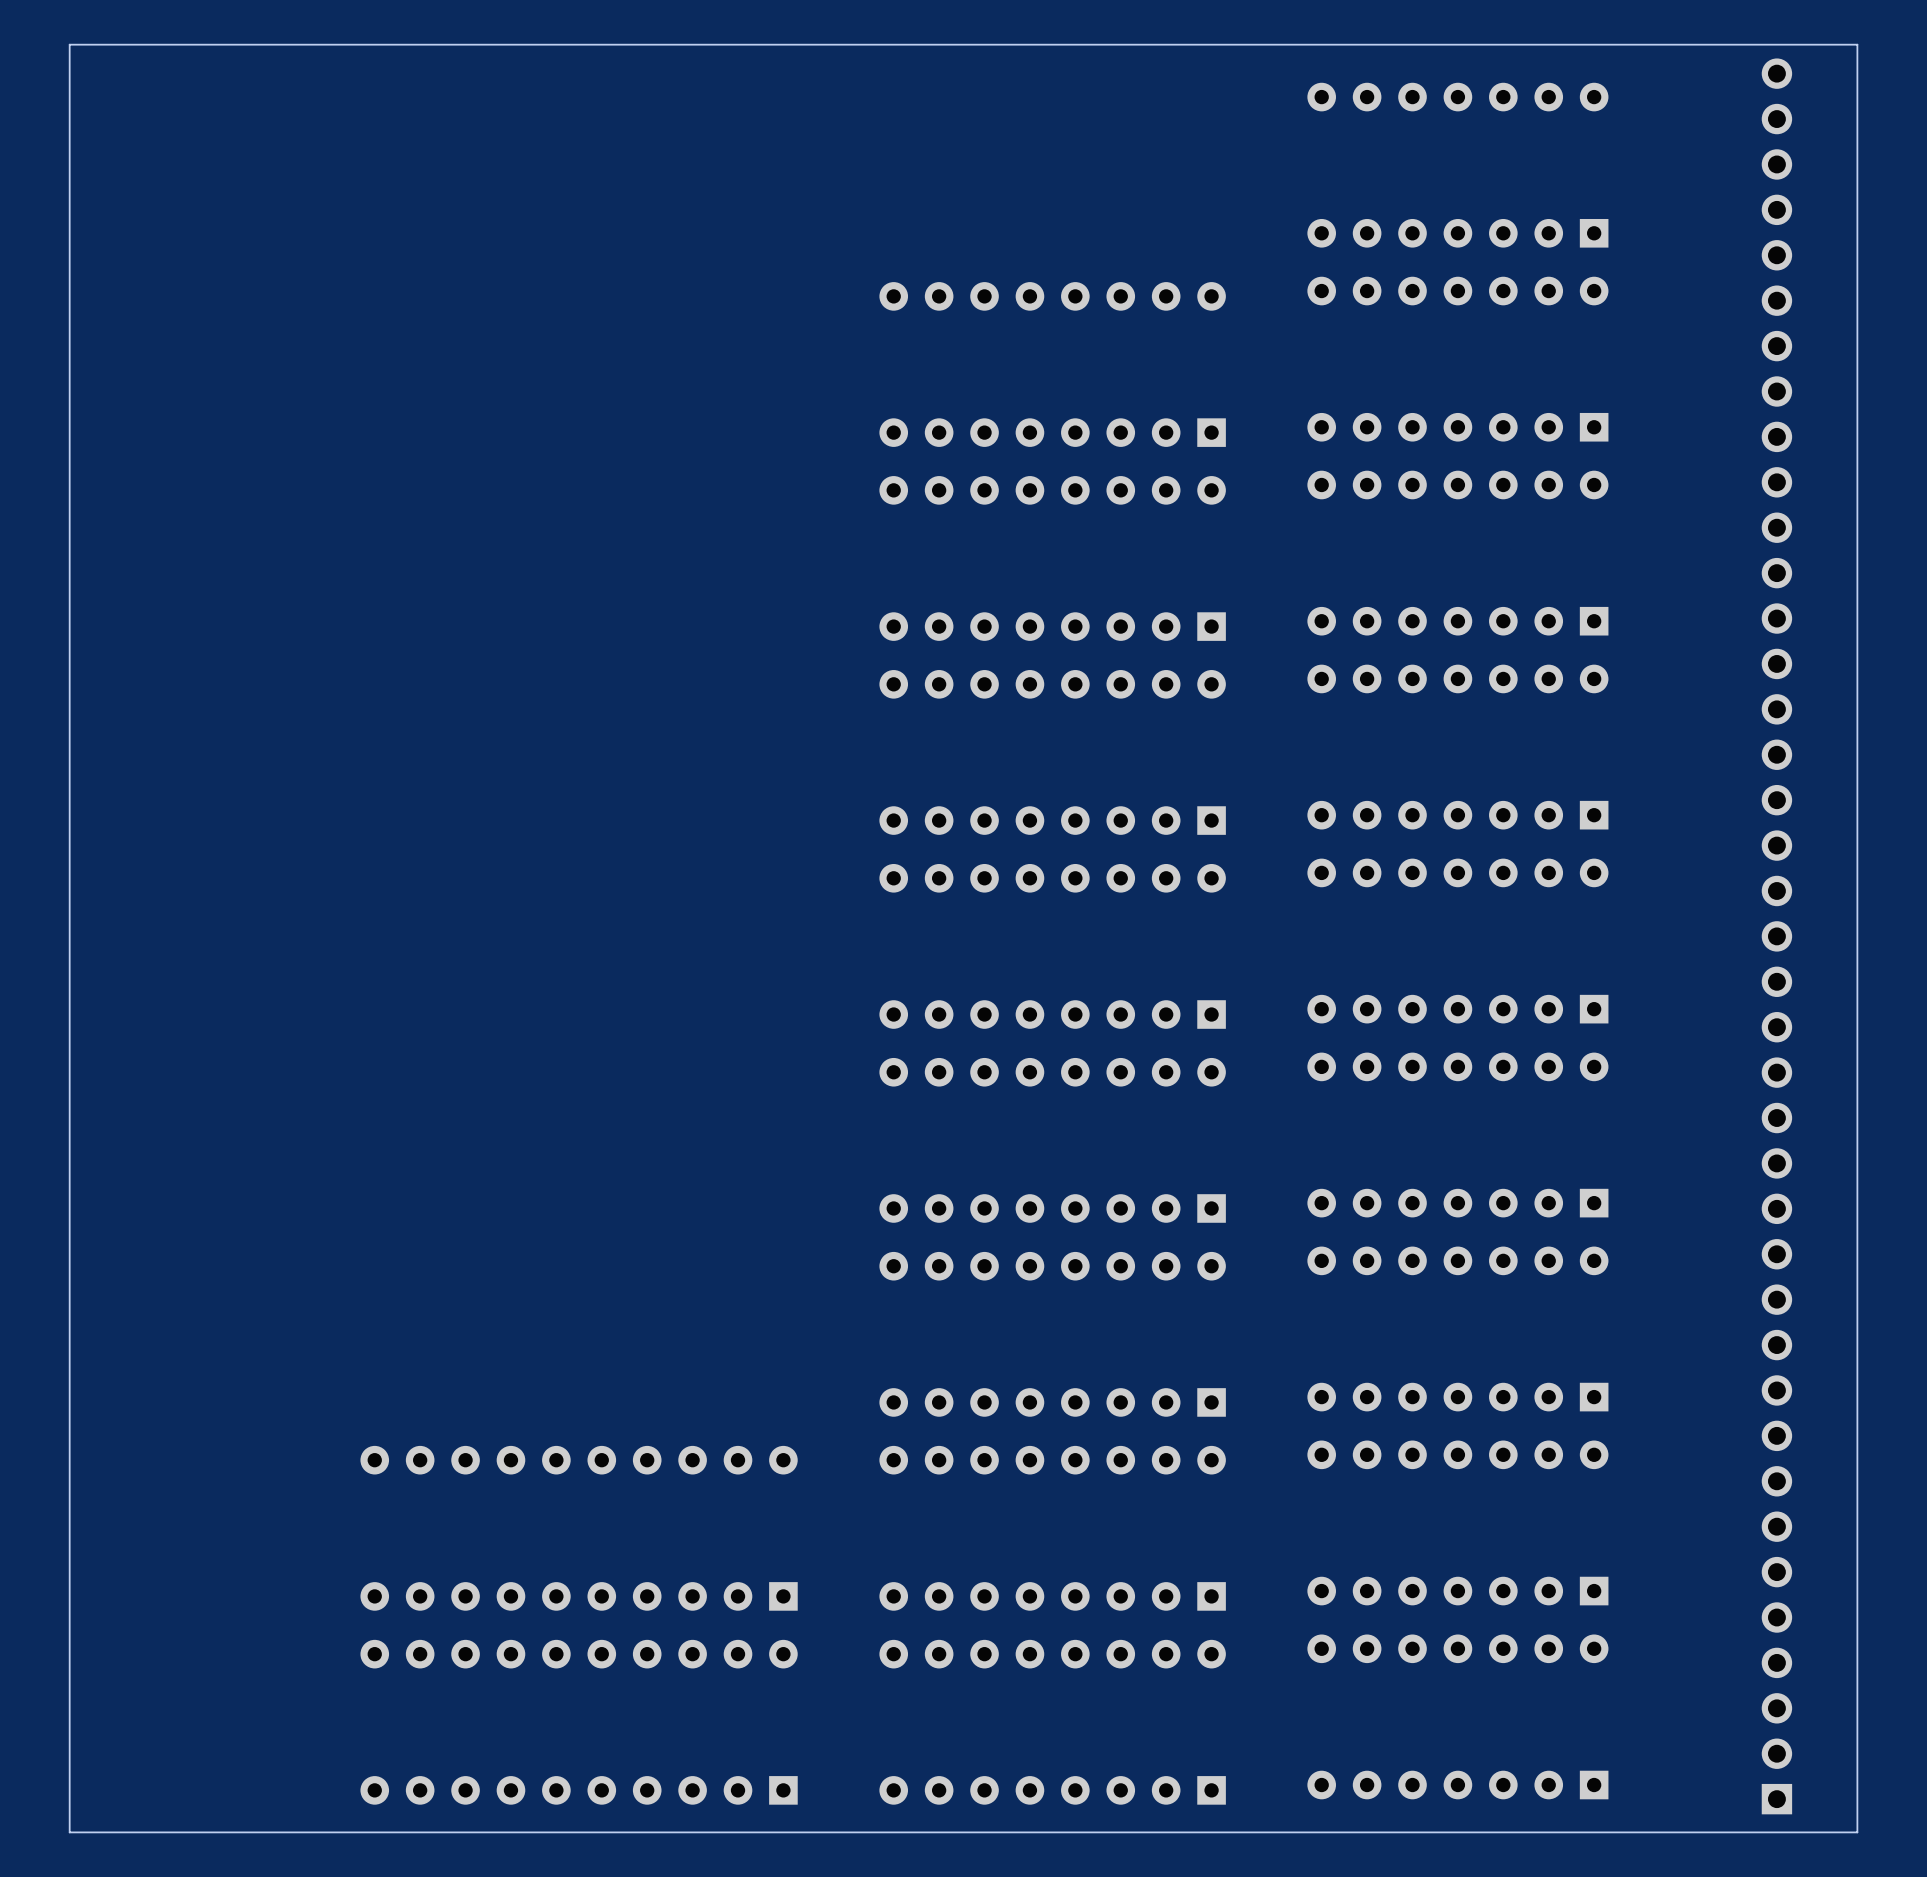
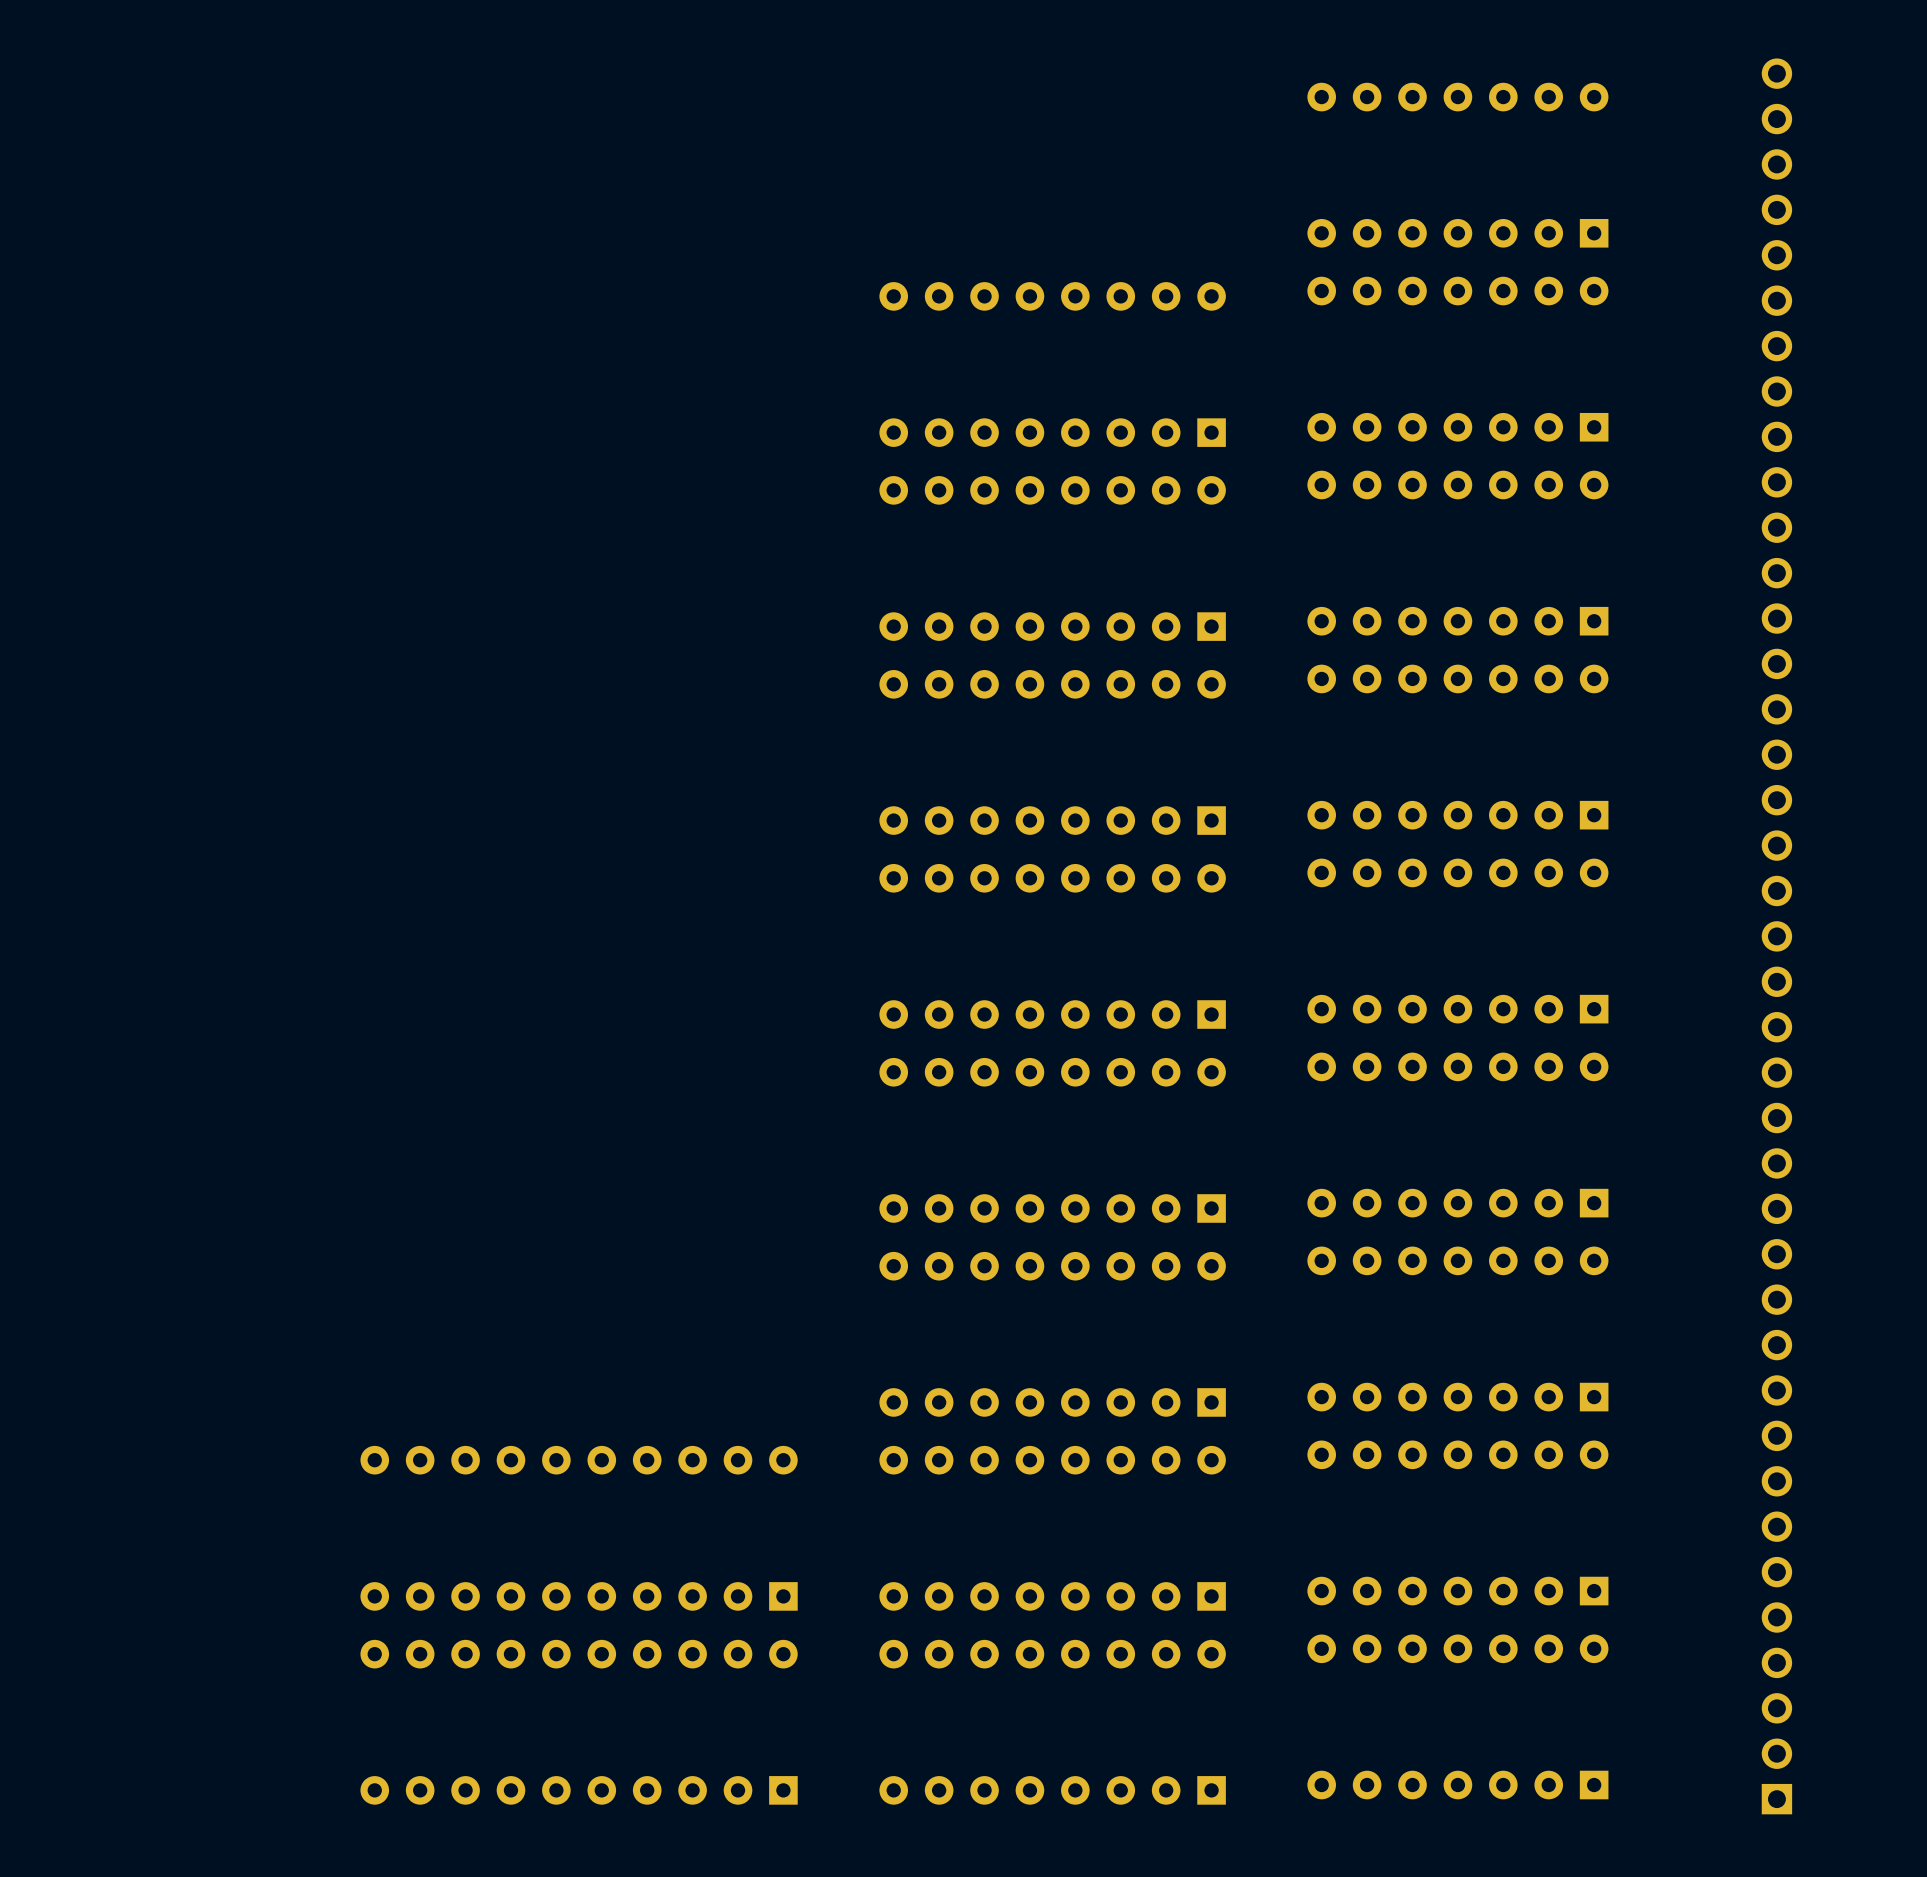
board edge: (1857, 44) (69, 44) (69, 1832) (1857, 1832) (1857, 44) -> none

